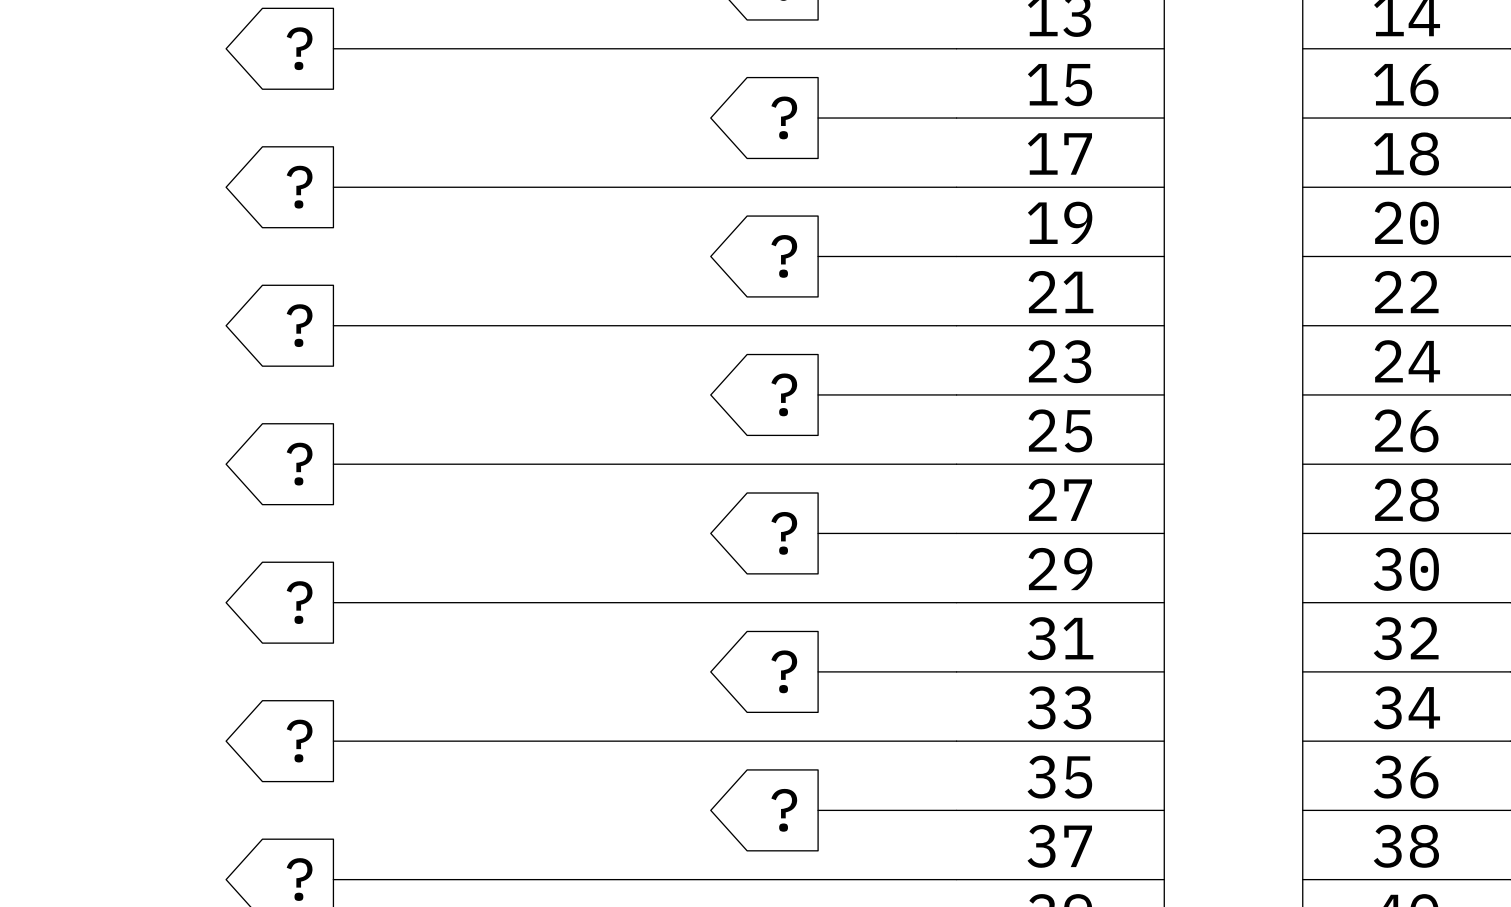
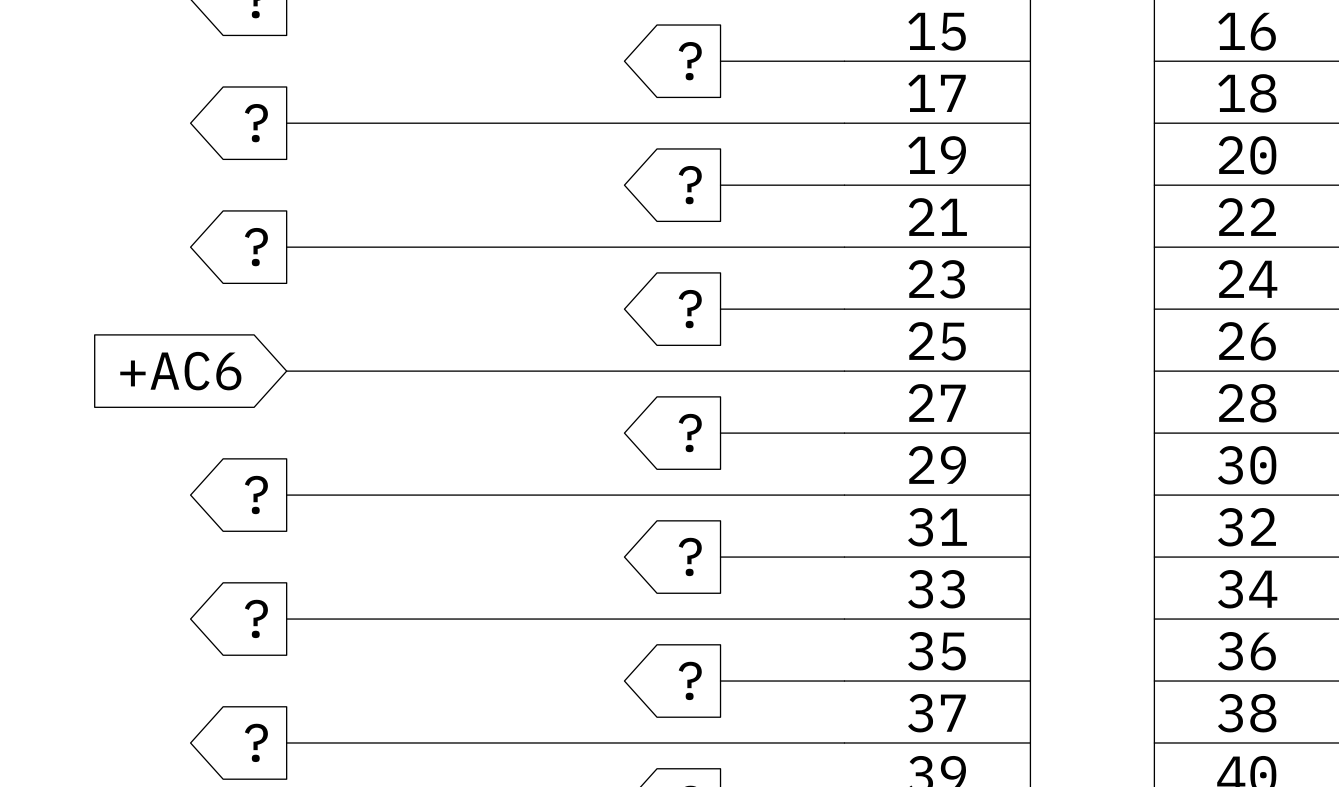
global label shape: output (299, 464) -> input (180, 371)
global label: ? (299, 464) -> +AC6 (180, 371)

